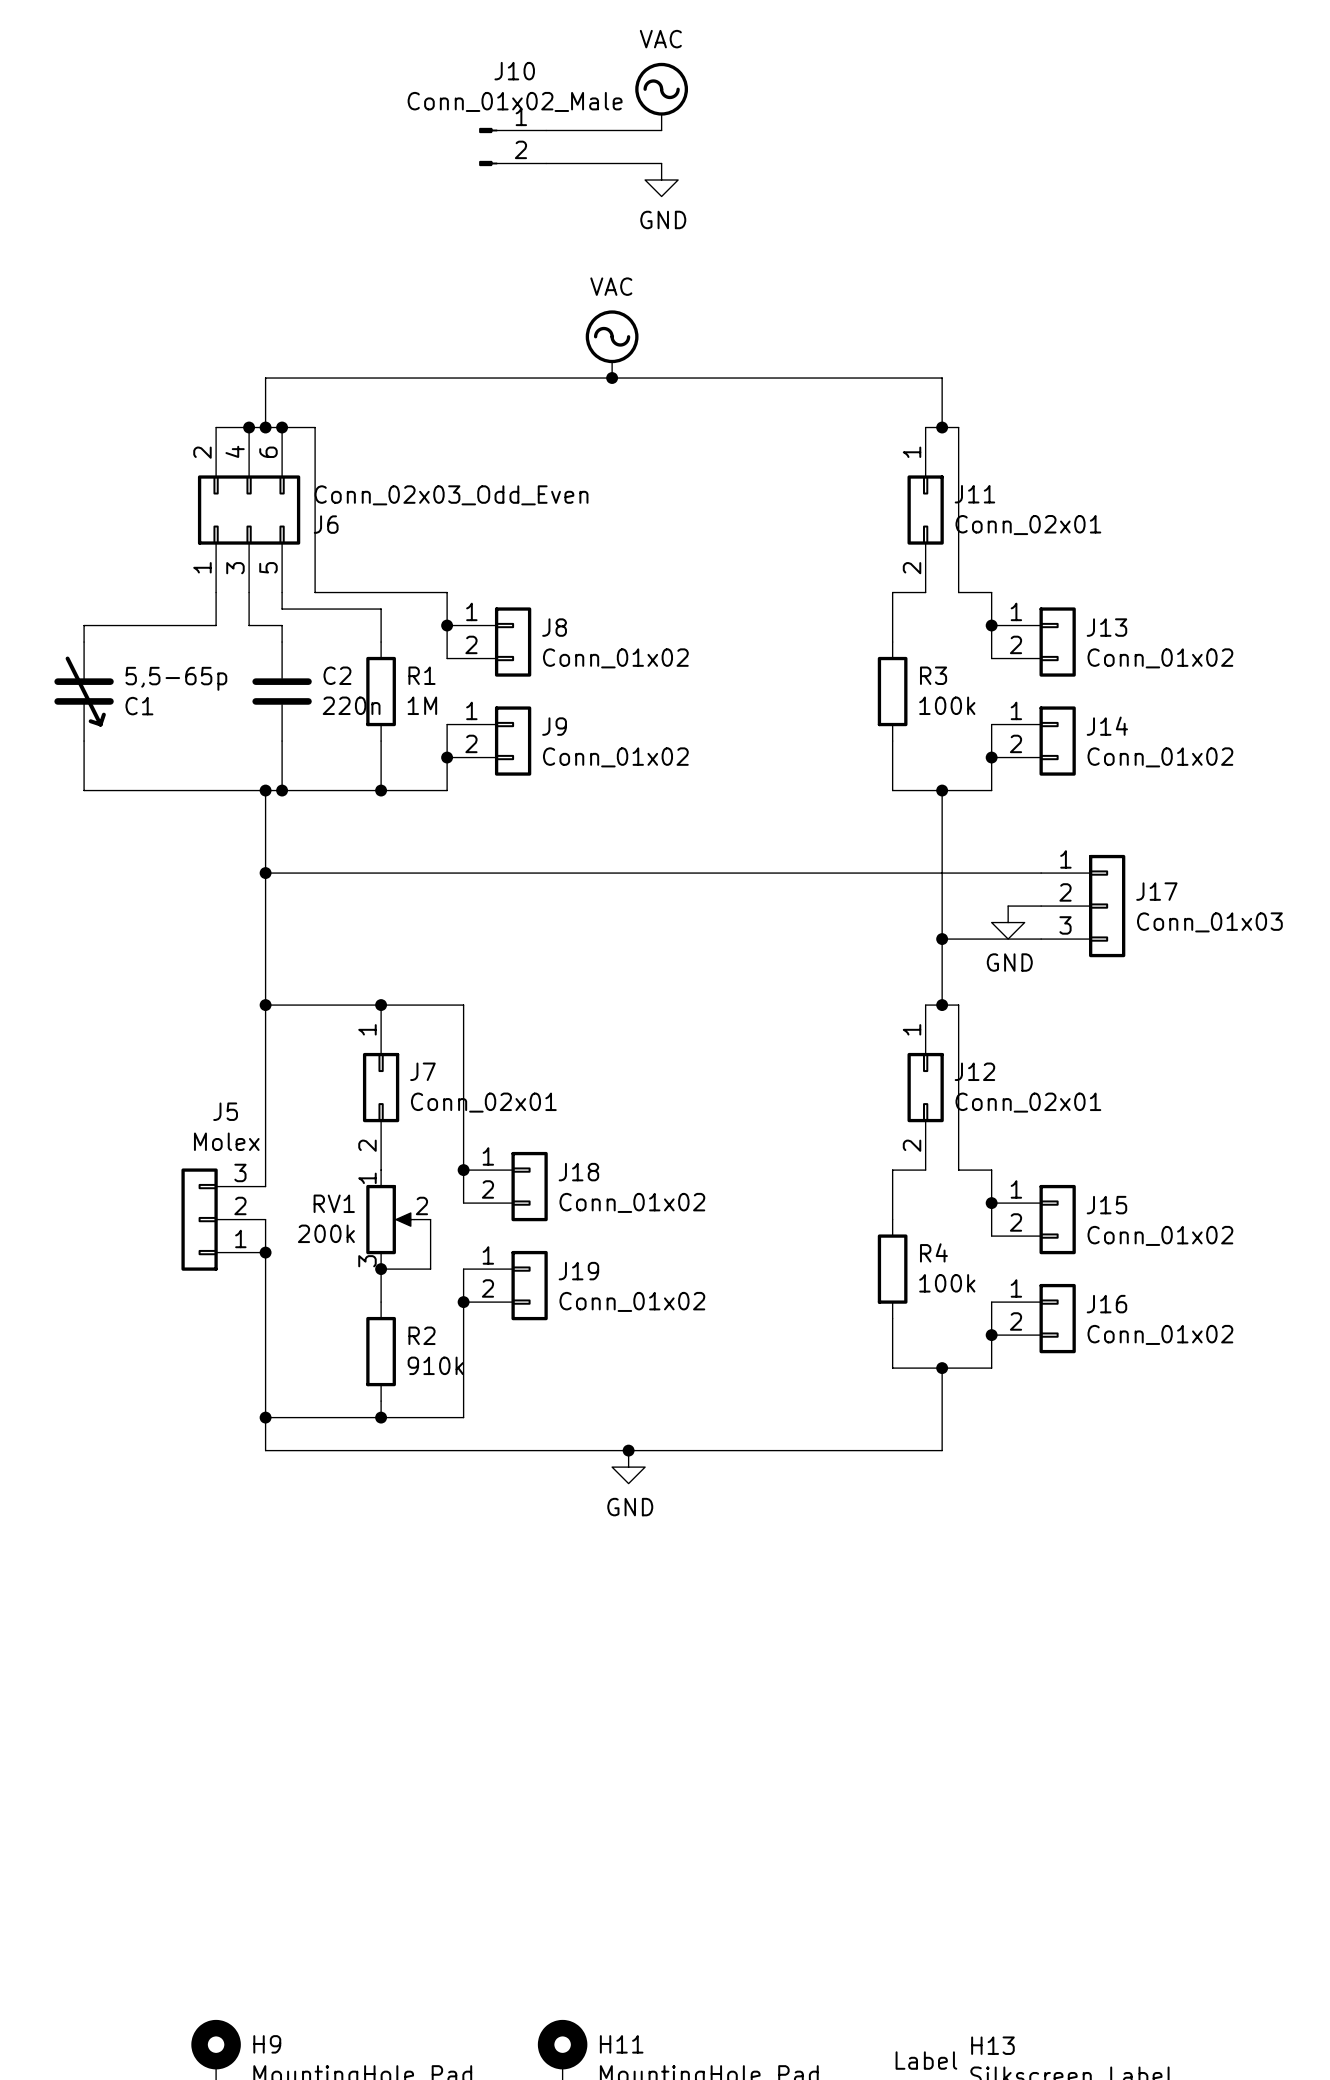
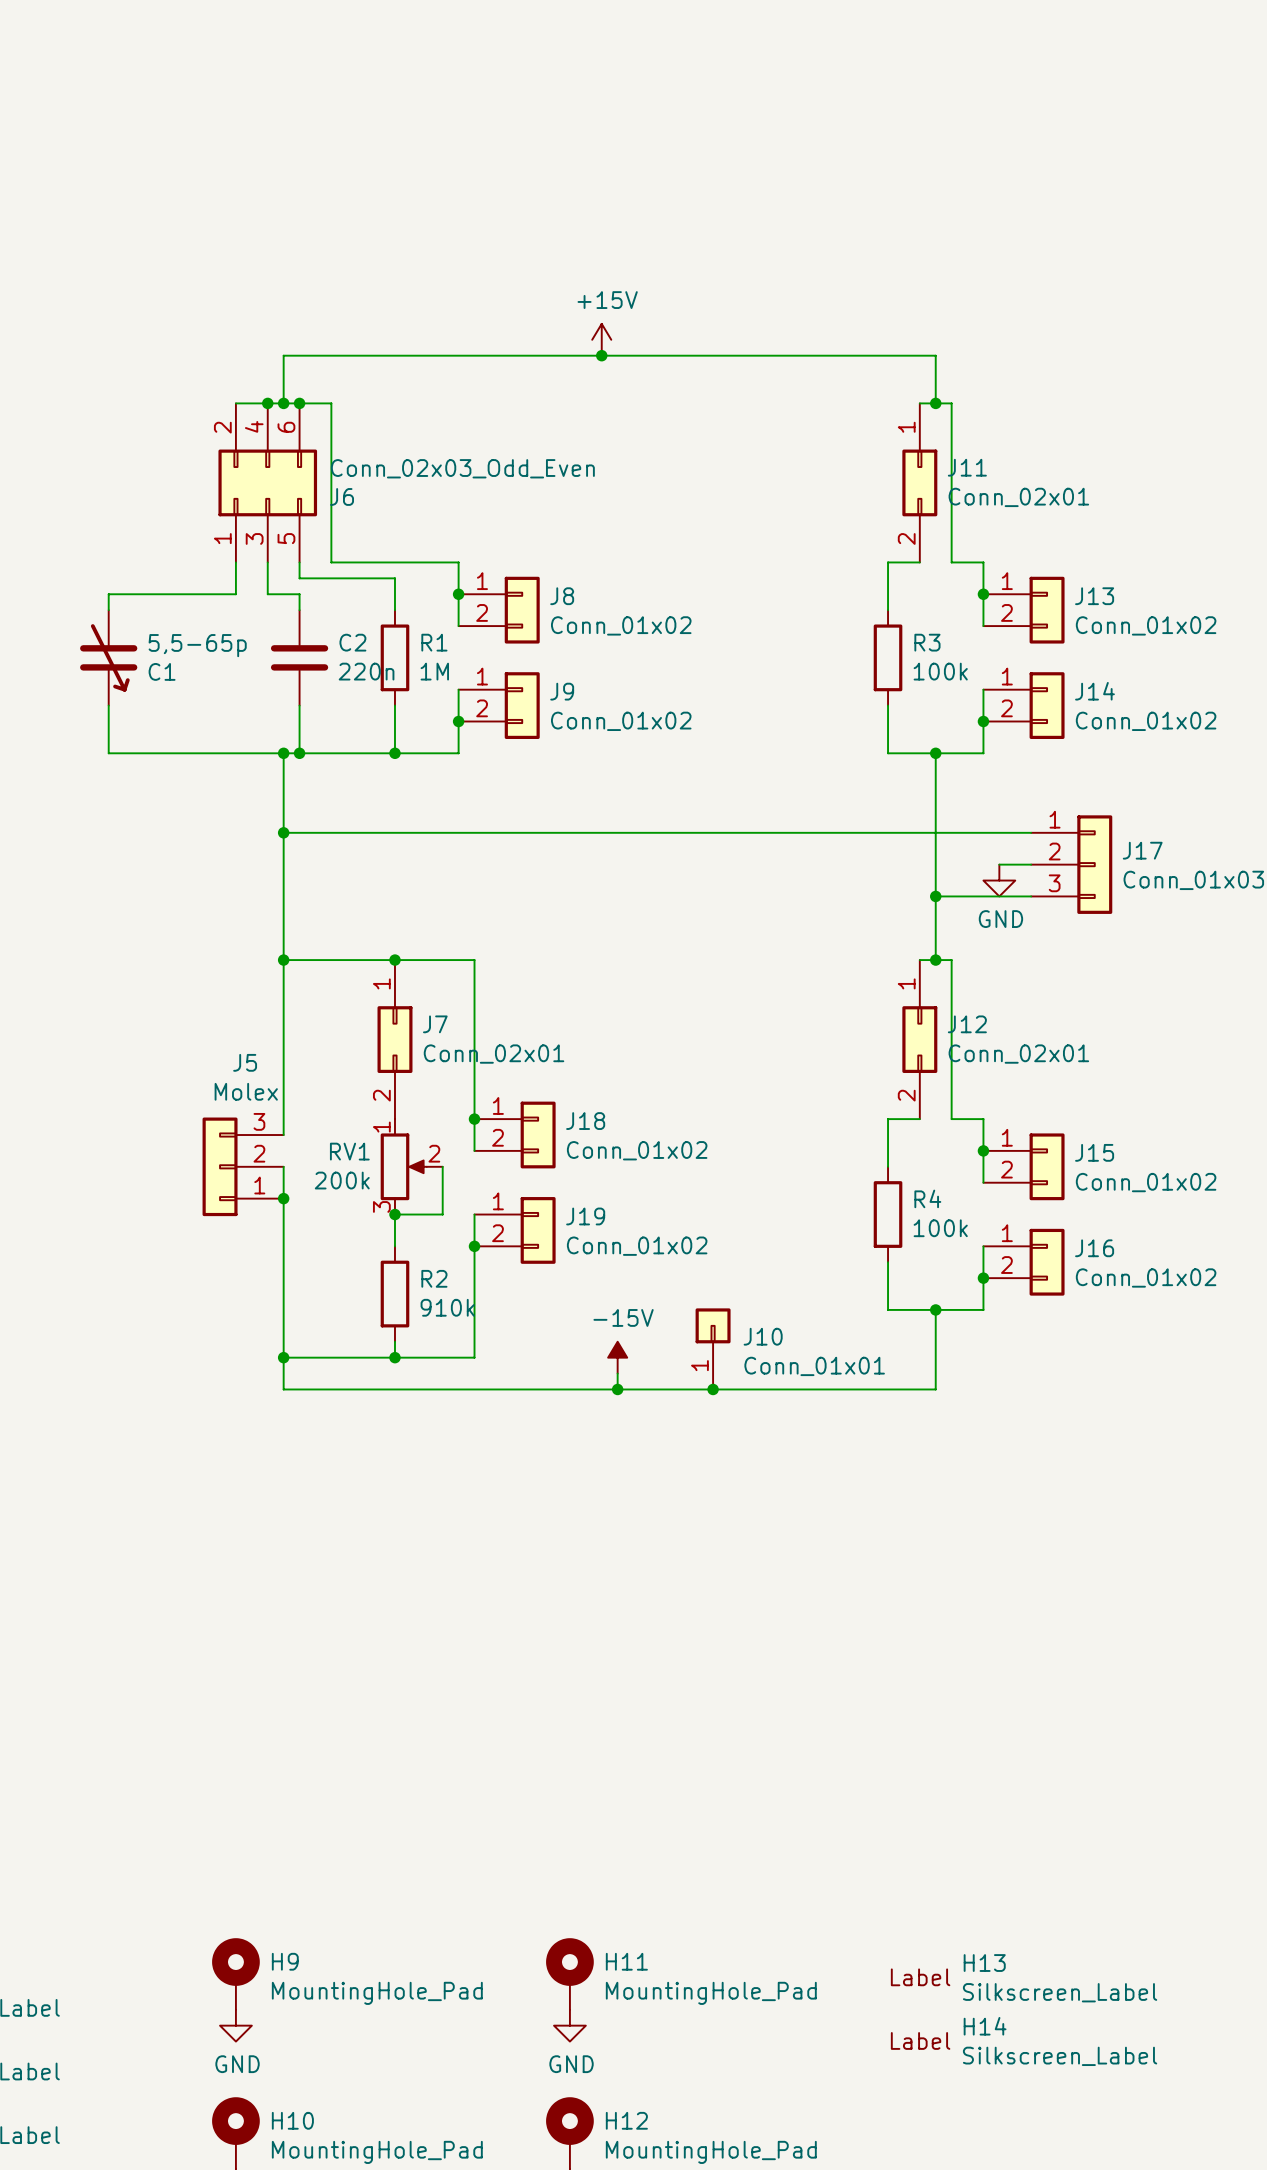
J10 name position: J10 (514, 71) -> J10 (763, 1336)
power symbol: VAC (661, 96) -> none
J10 value: Conn_01x02_Male (515, 101) -> Conn_01x01 (814, 1366)
J10 symbol: [479, 127, 547, 167] -> [695, 1308, 731, 1390]
wire: (546, 130) (661, 130) -> none
wire: (546, 163) (661, 163) -> none
power symbol: GND (661, 180) -> none
power symbol: VAC (612, 344) -> none
power symbol: none -> +15V (601, 339)
junction position: (612, 378) -> (601, 355)
power symbol: none -> -15V (617, 1357)
wire: none -> (617, 1373) (617, 1389)
junction position: (628, 1450) -> (617, 1389)
junction: none -> (713, 1389)
power symbol: GND (628, 1467) -> none

